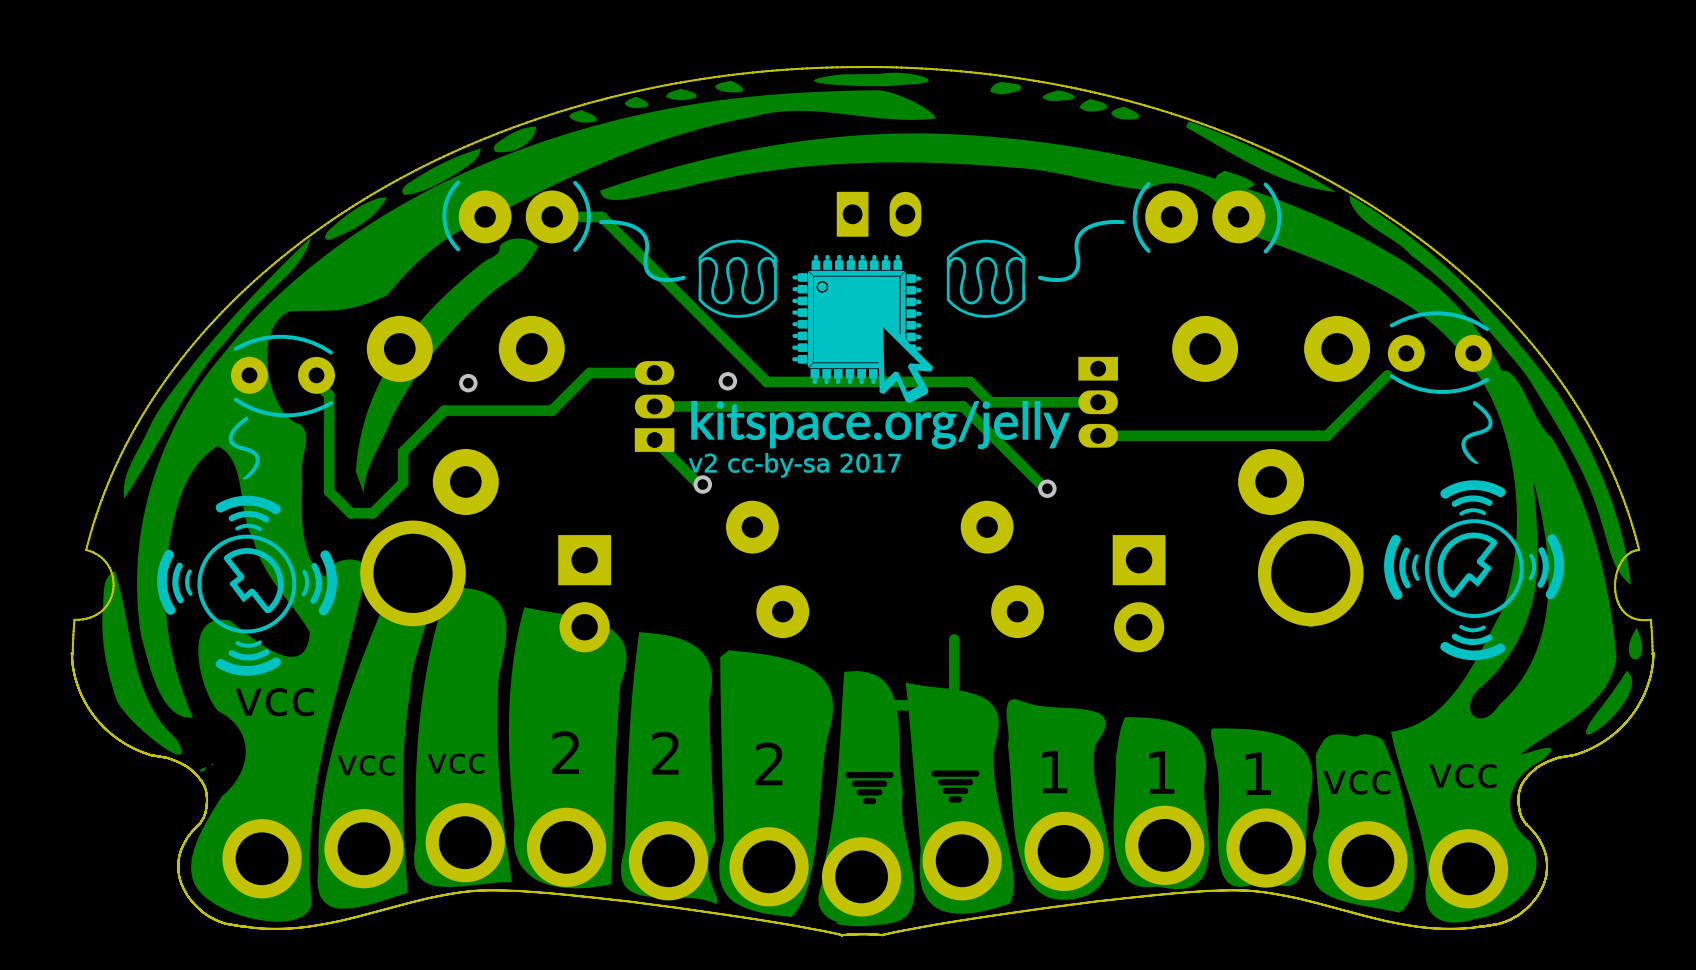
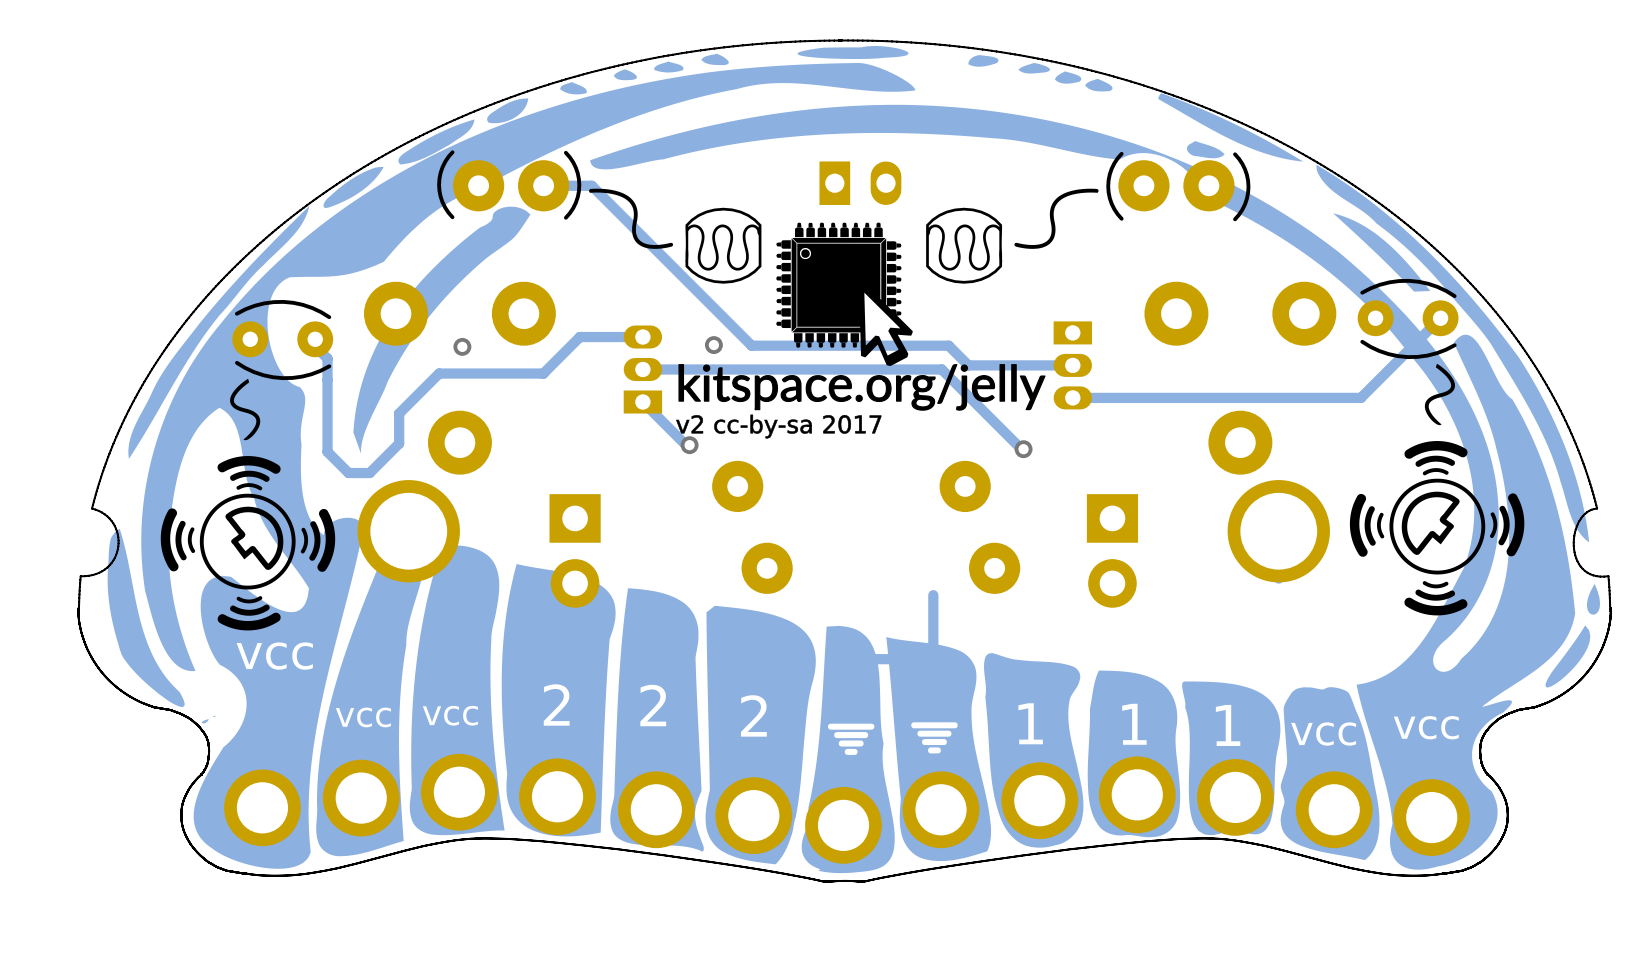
drawing shape: [102, 72, 1643, 927] -> [107, 46, 1601, 874]
part rotation: 0° (1439, 352) -> 180° (1408, 318)
track: (1387, 375) (1327, 435) -> (1440, 318) (1360, 397) (1294, 397)

